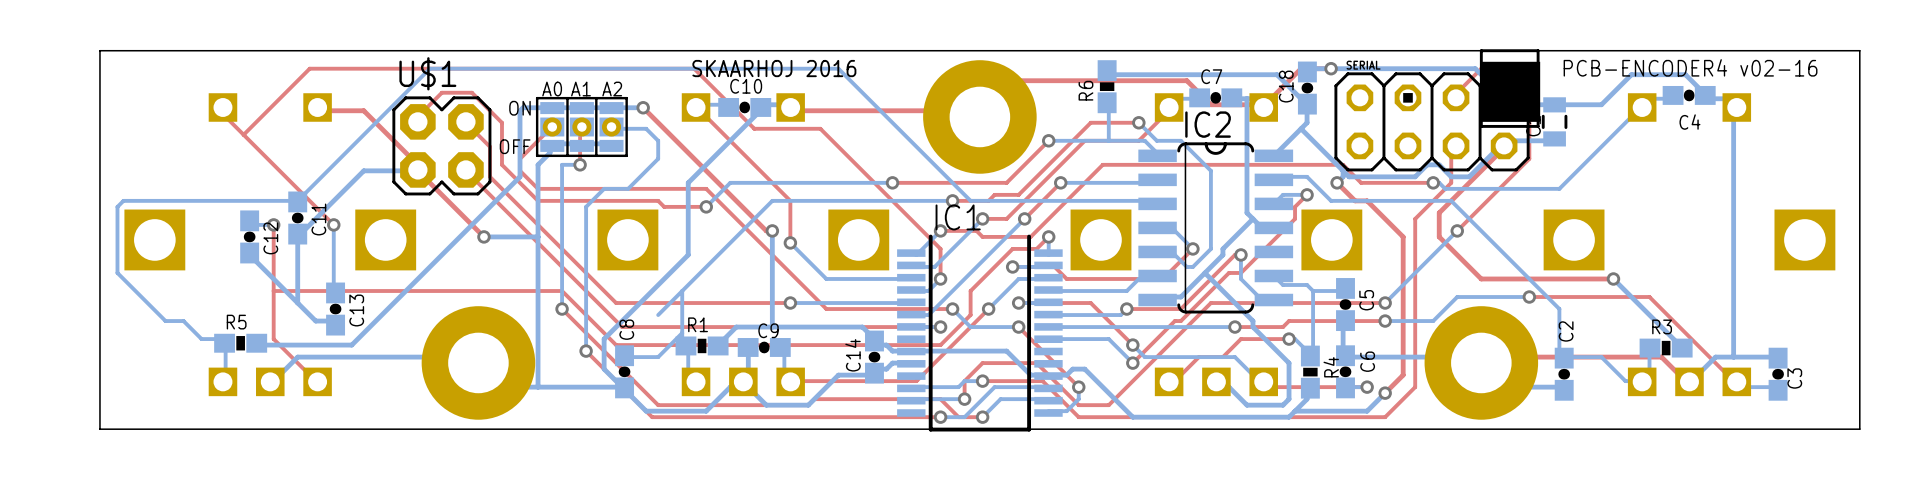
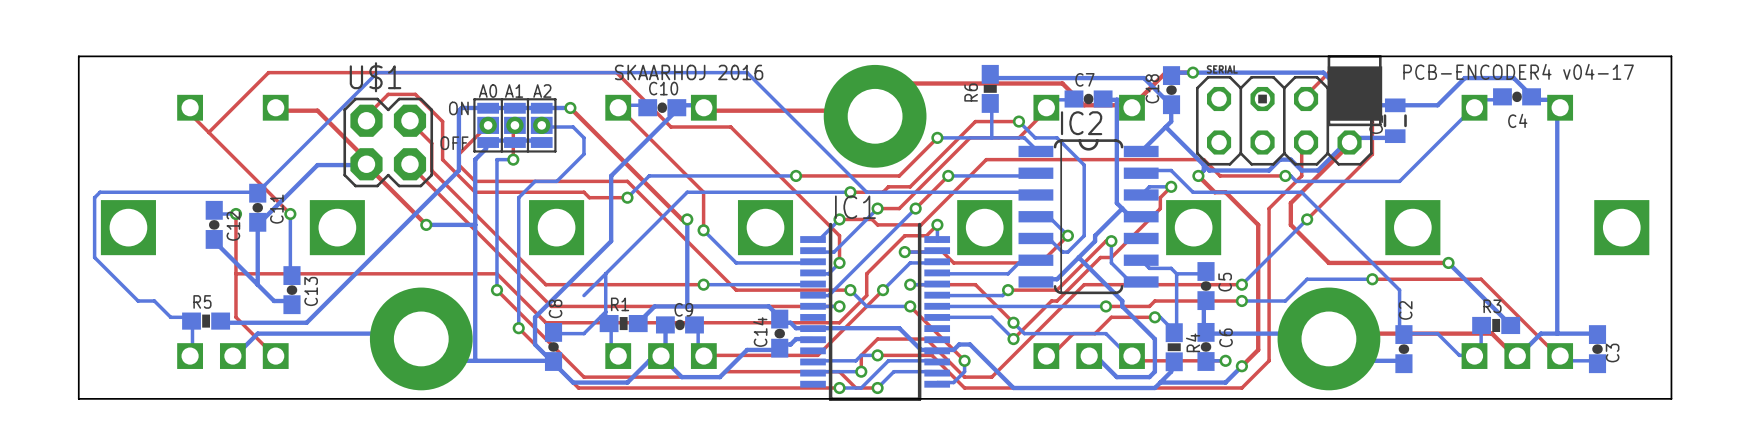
text: PCB-ENCODER4 v02-16 (1690, 67) -> PCB-ENCODER4 v04-17 (1518, 71)

